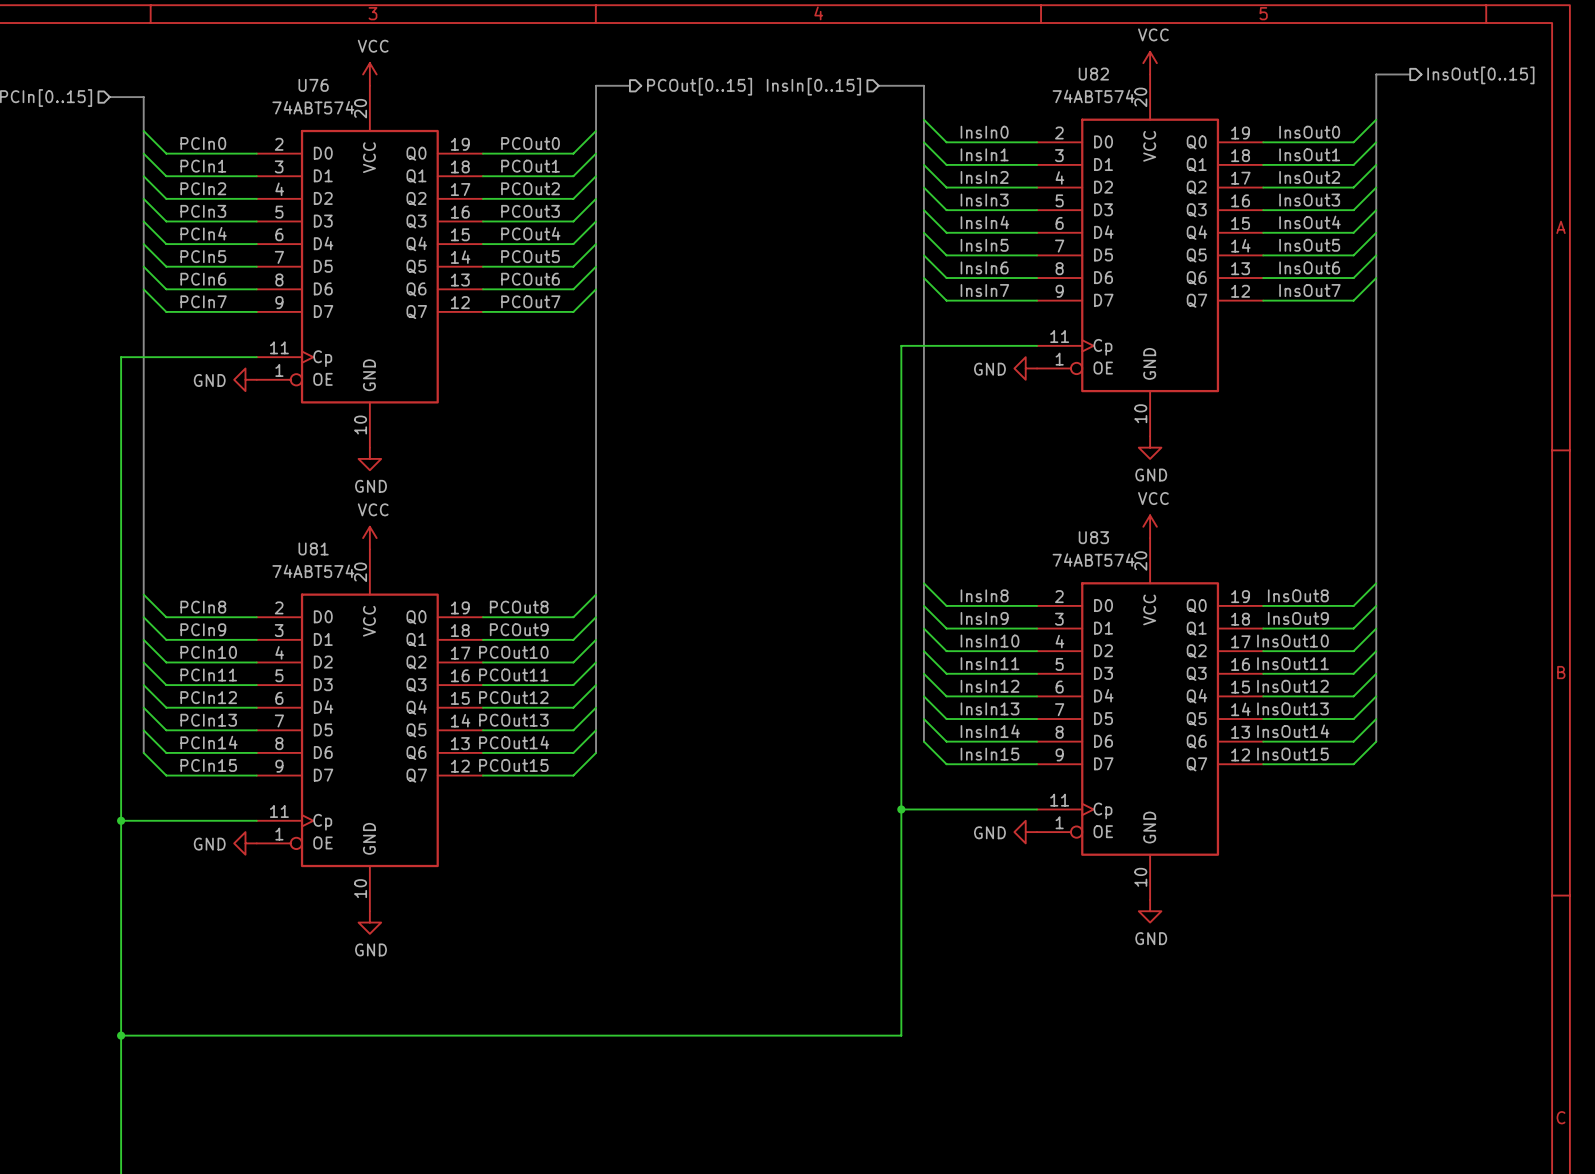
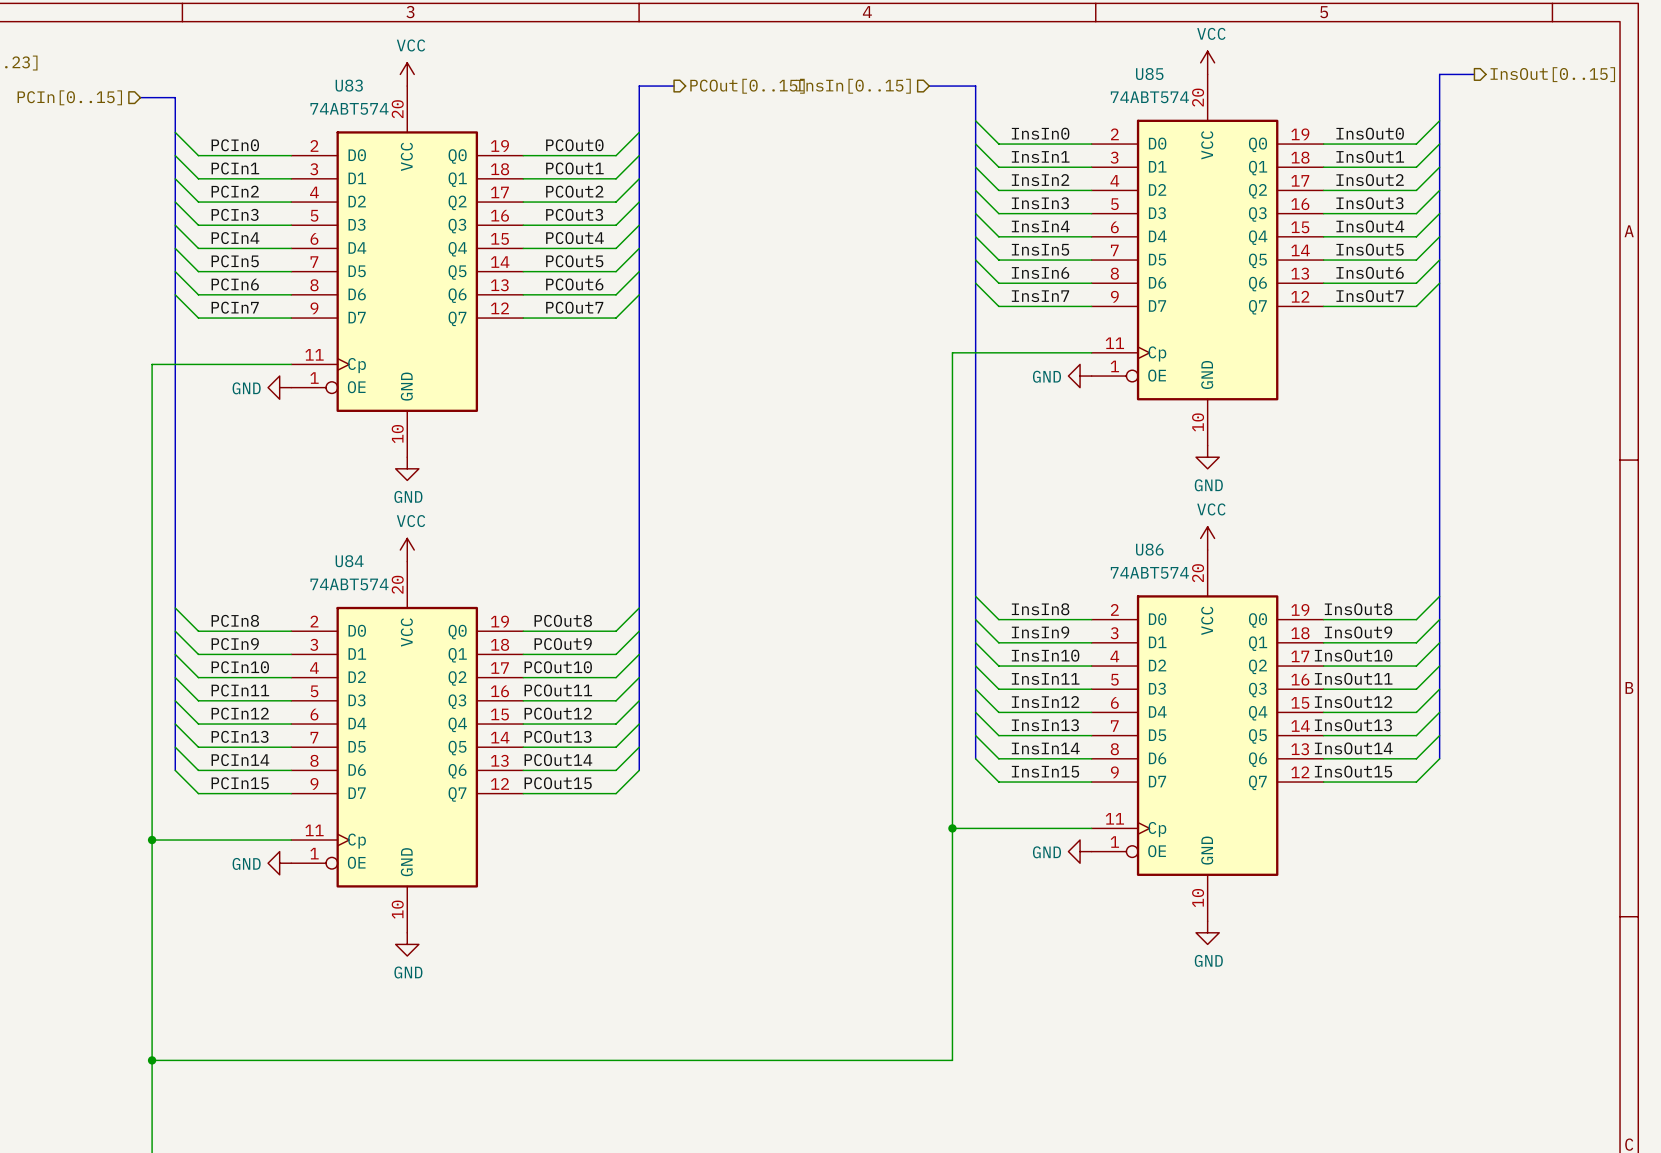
U82 name: U82 (1093, 74) -> U85 (1149, 74)
U76 name: U76 (313, 85) -> U83 (349, 85)
U83 name: U83 (1093, 537) -> U86 (1149, 549)
U81 name: U81 (313, 548) -> U84 (349, 561)

